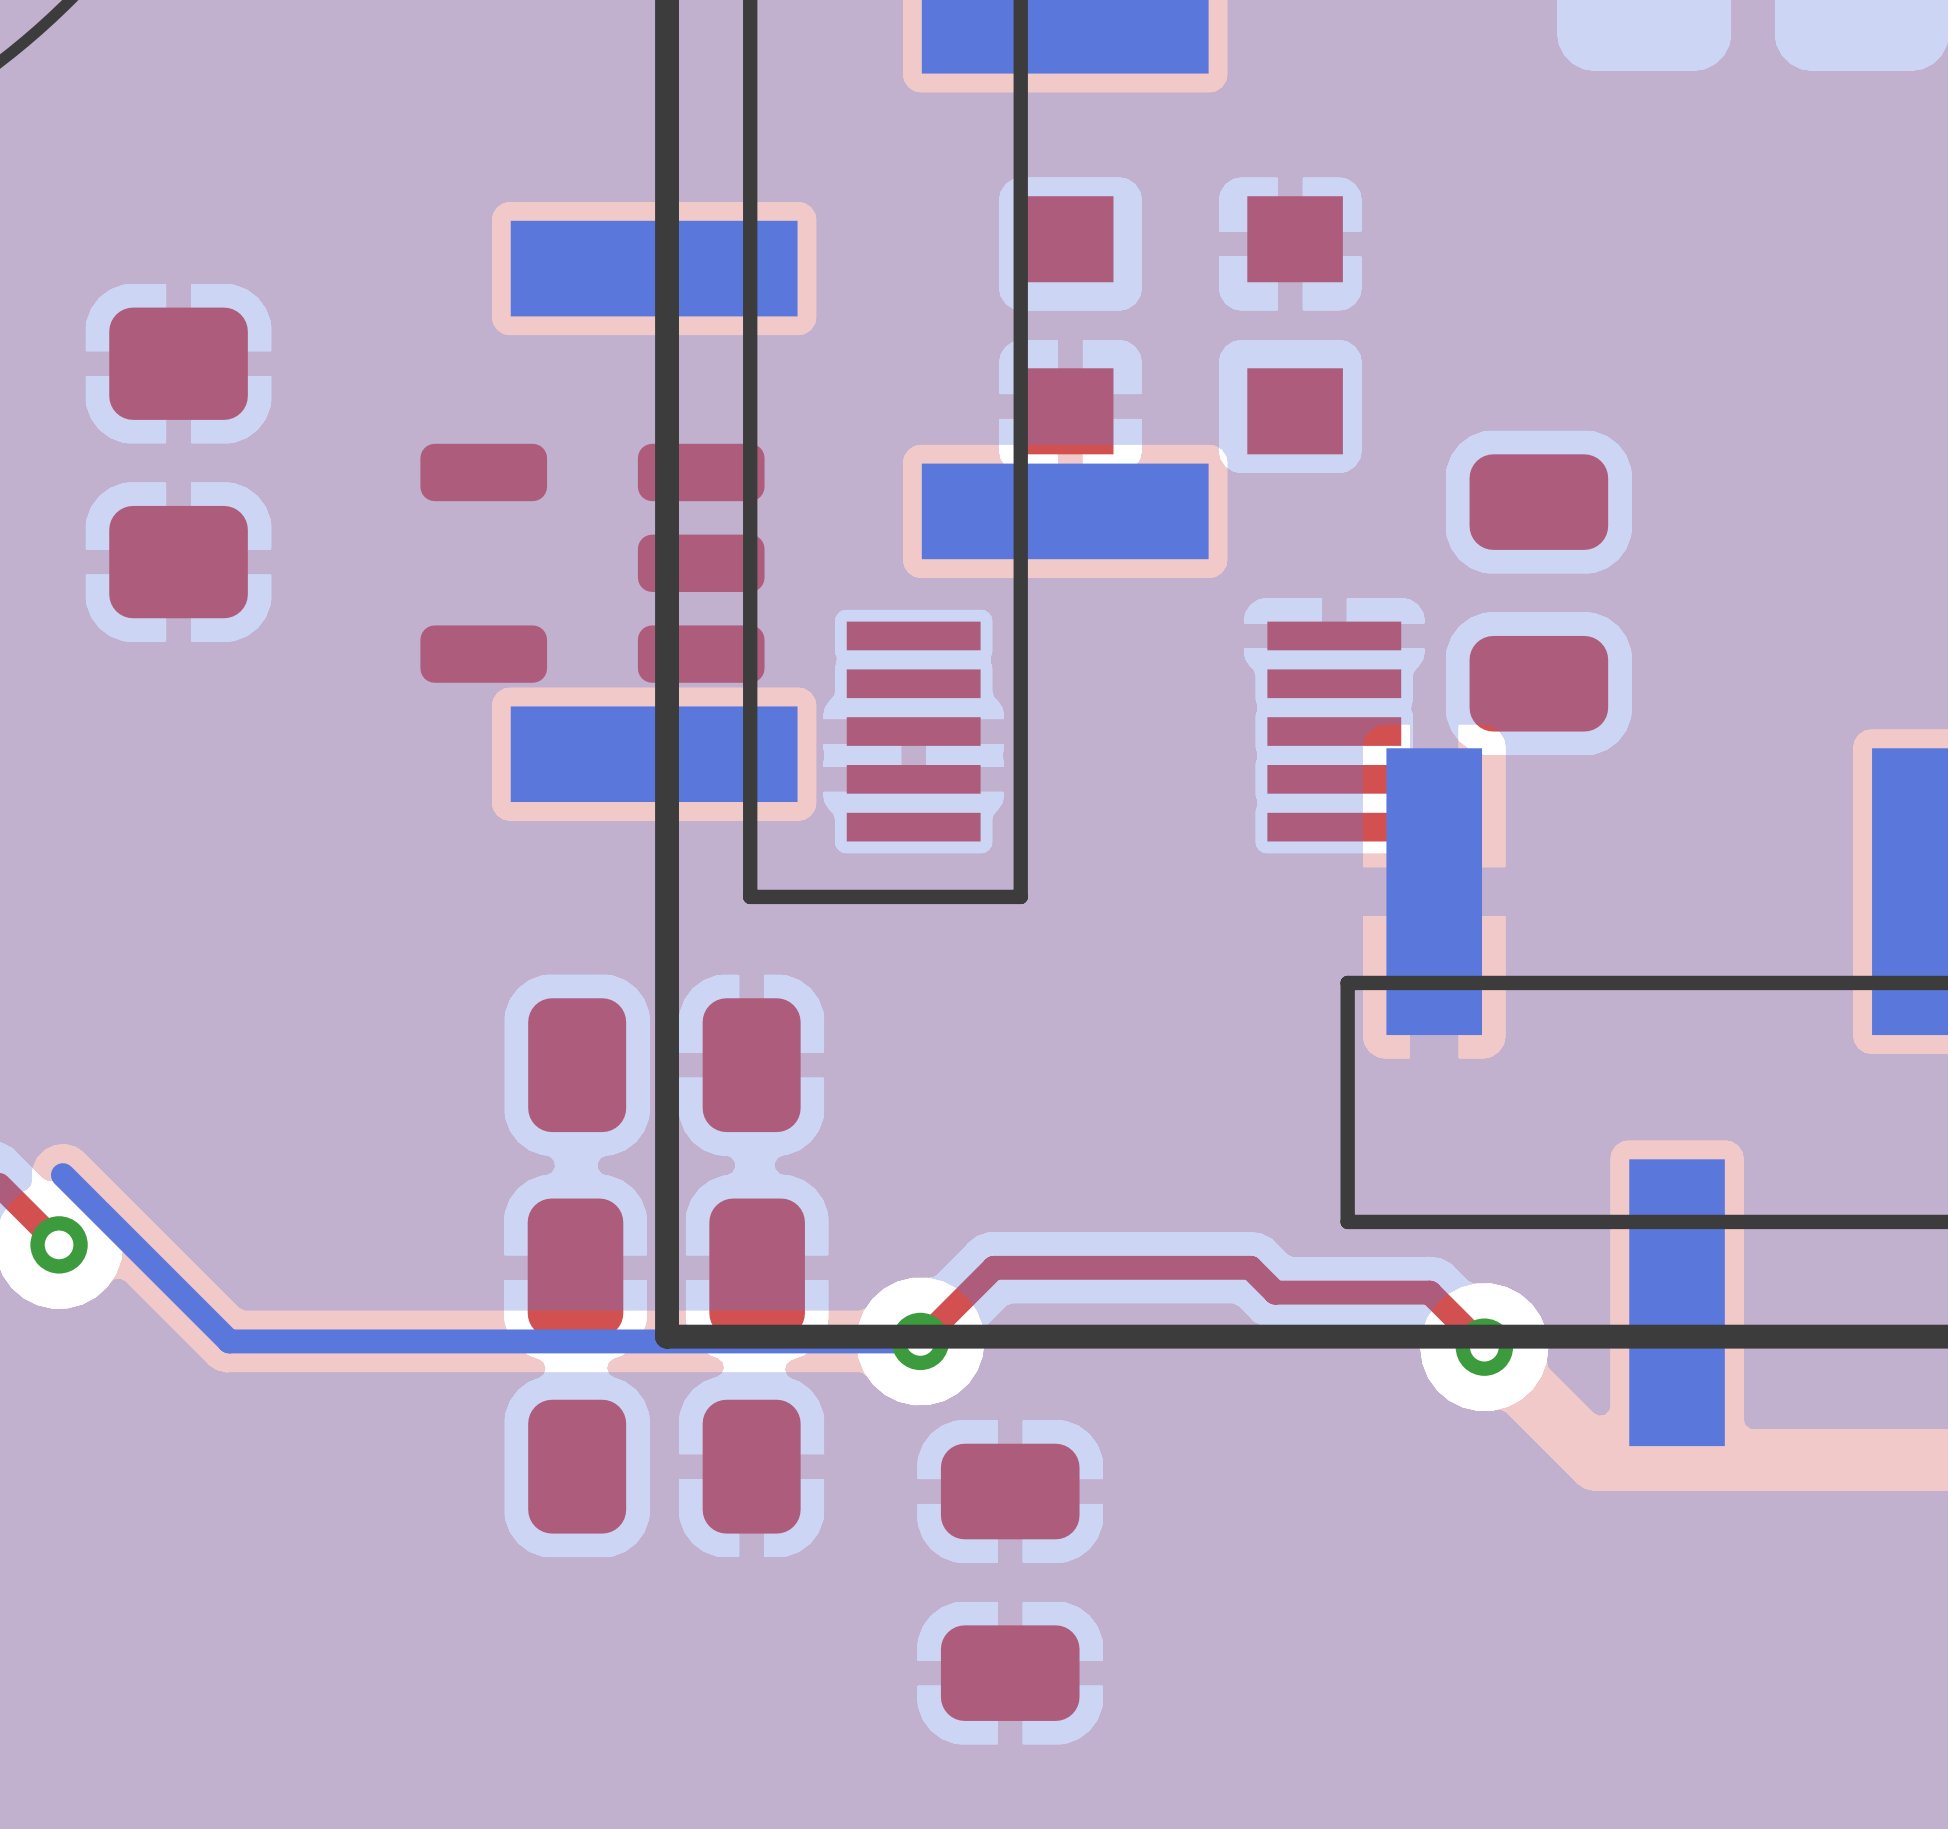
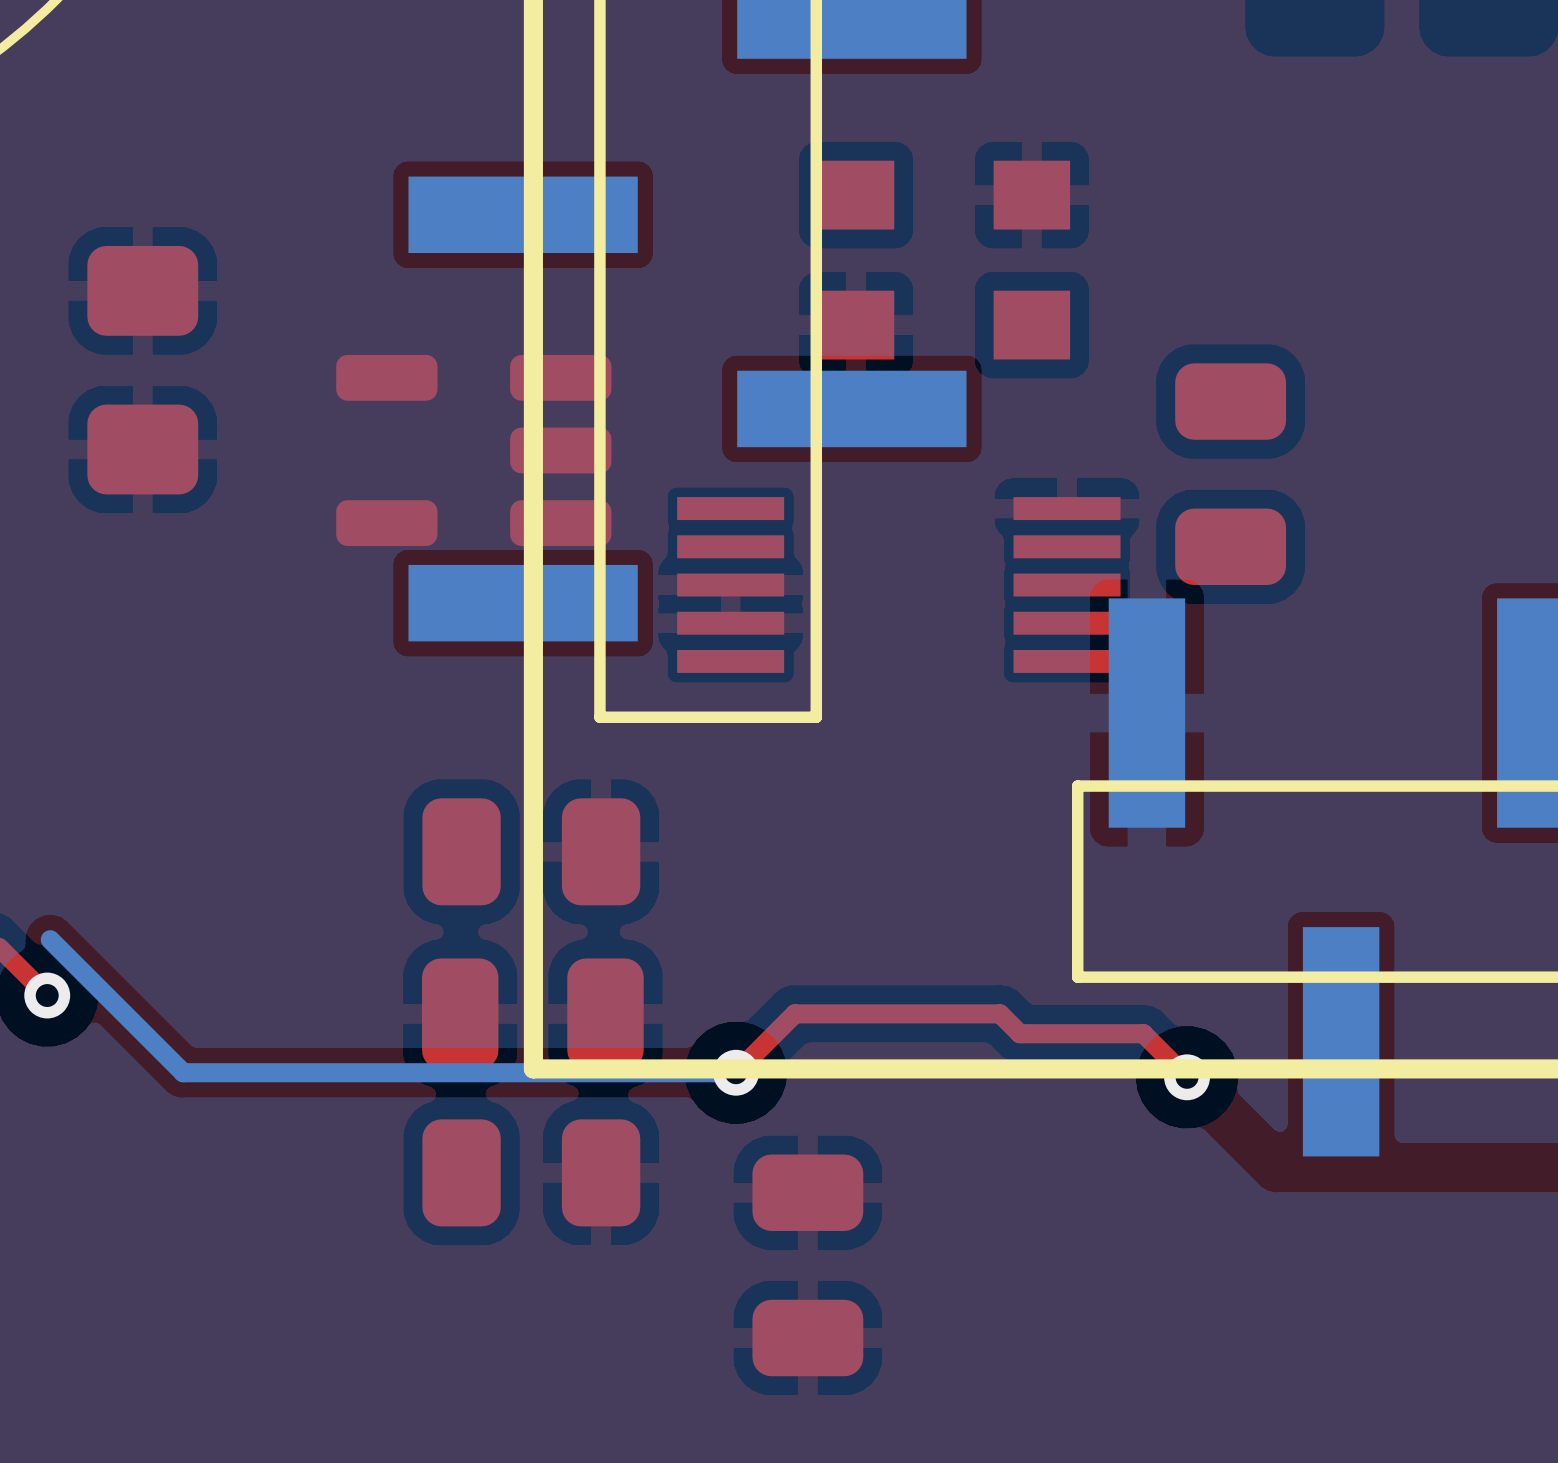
part footprint: [1017, 196, 1343, 455] -> [817, 160, 1071, 360]

